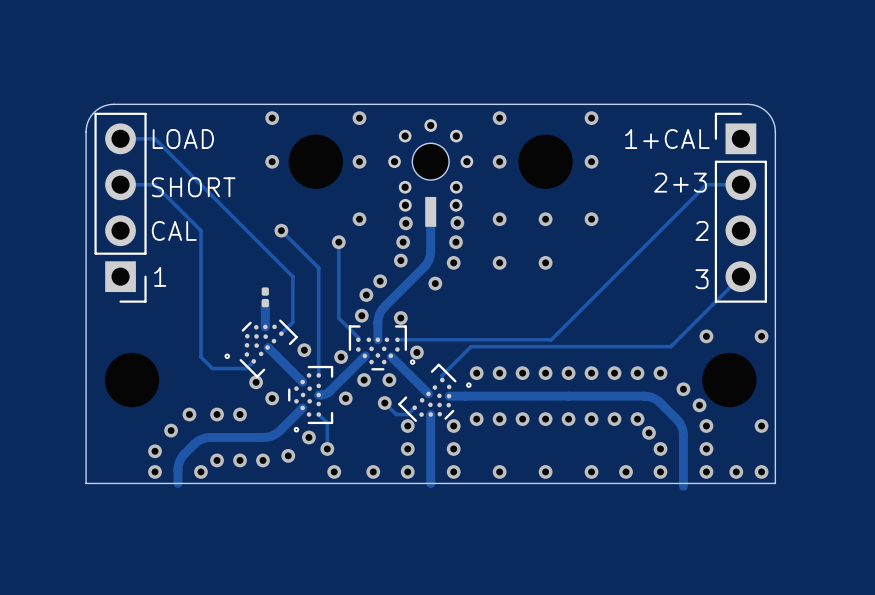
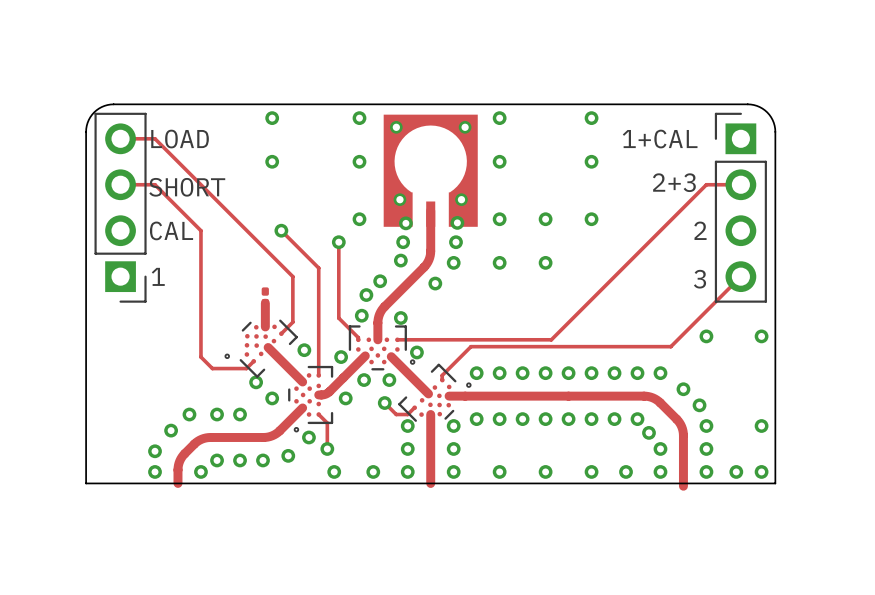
part footprint: [388, 119, 474, 227] -> [383, 114, 478, 227]
part: (430, 161) -> none

